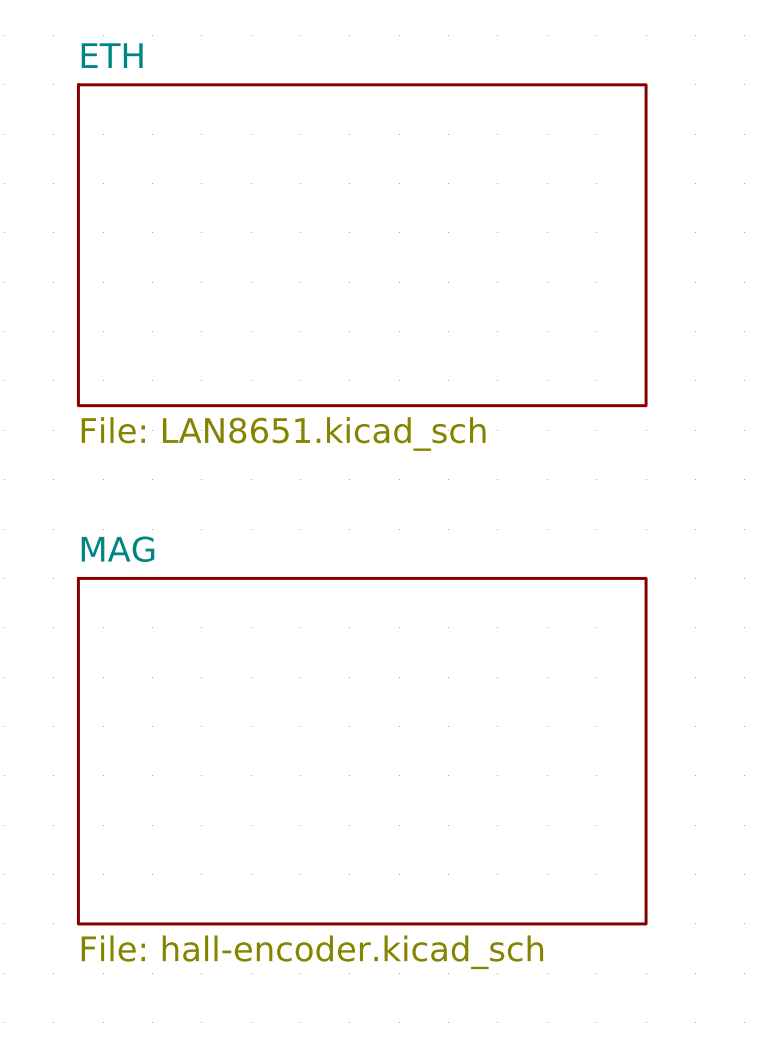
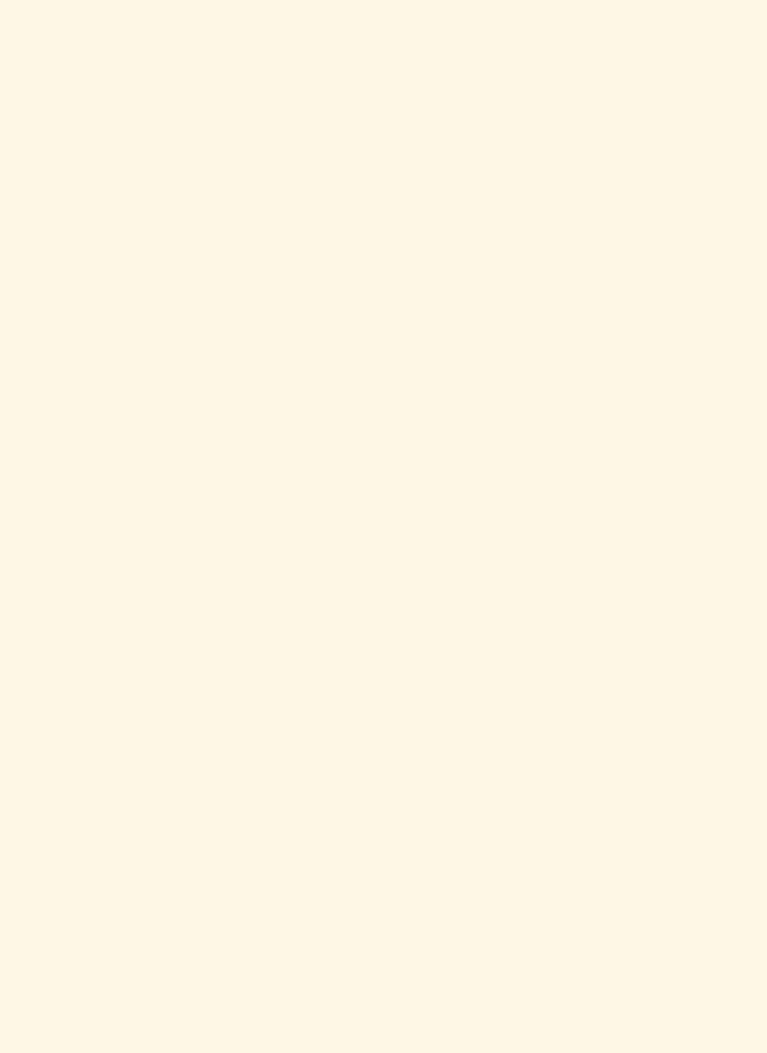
sheet ETH: File: LAN8651.kicad_sch (362, 245) -> none
sheet MAG: File: hall-encoder.kicad_sch (362, 751) -> none

